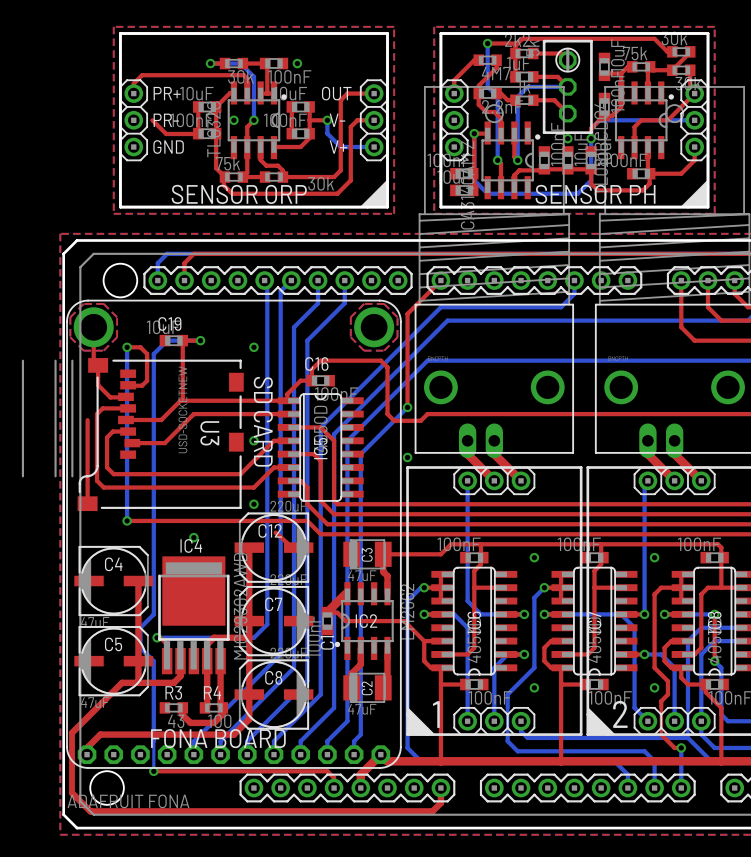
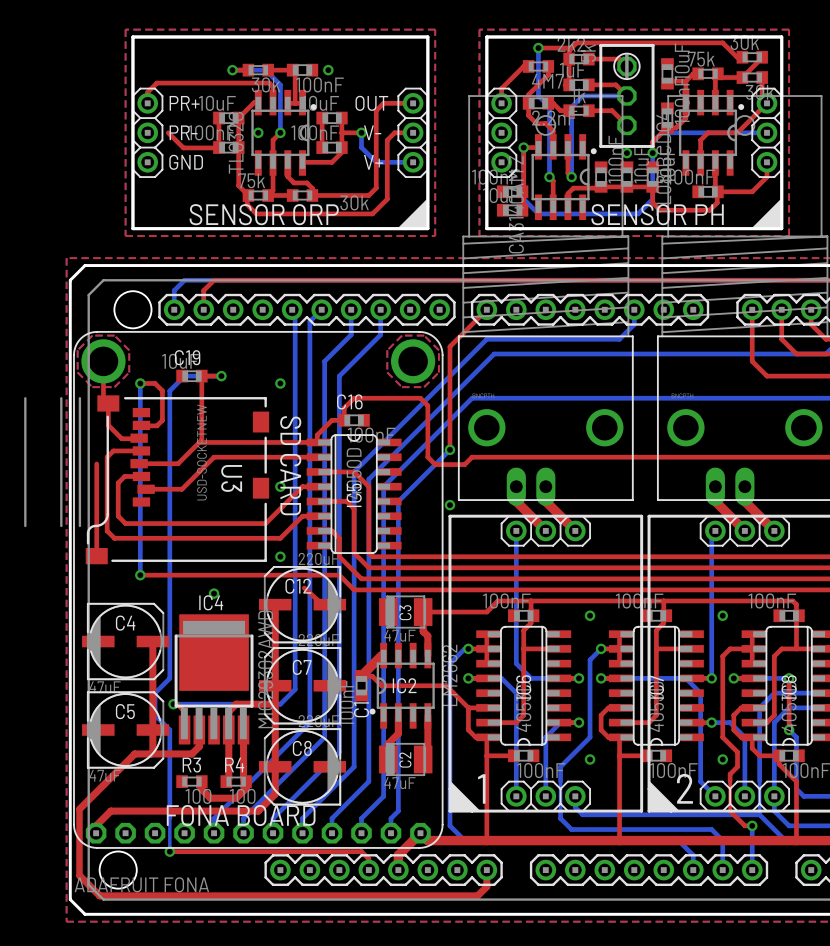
R3 value: 43 (176, 721) -> 100 (198, 796)

